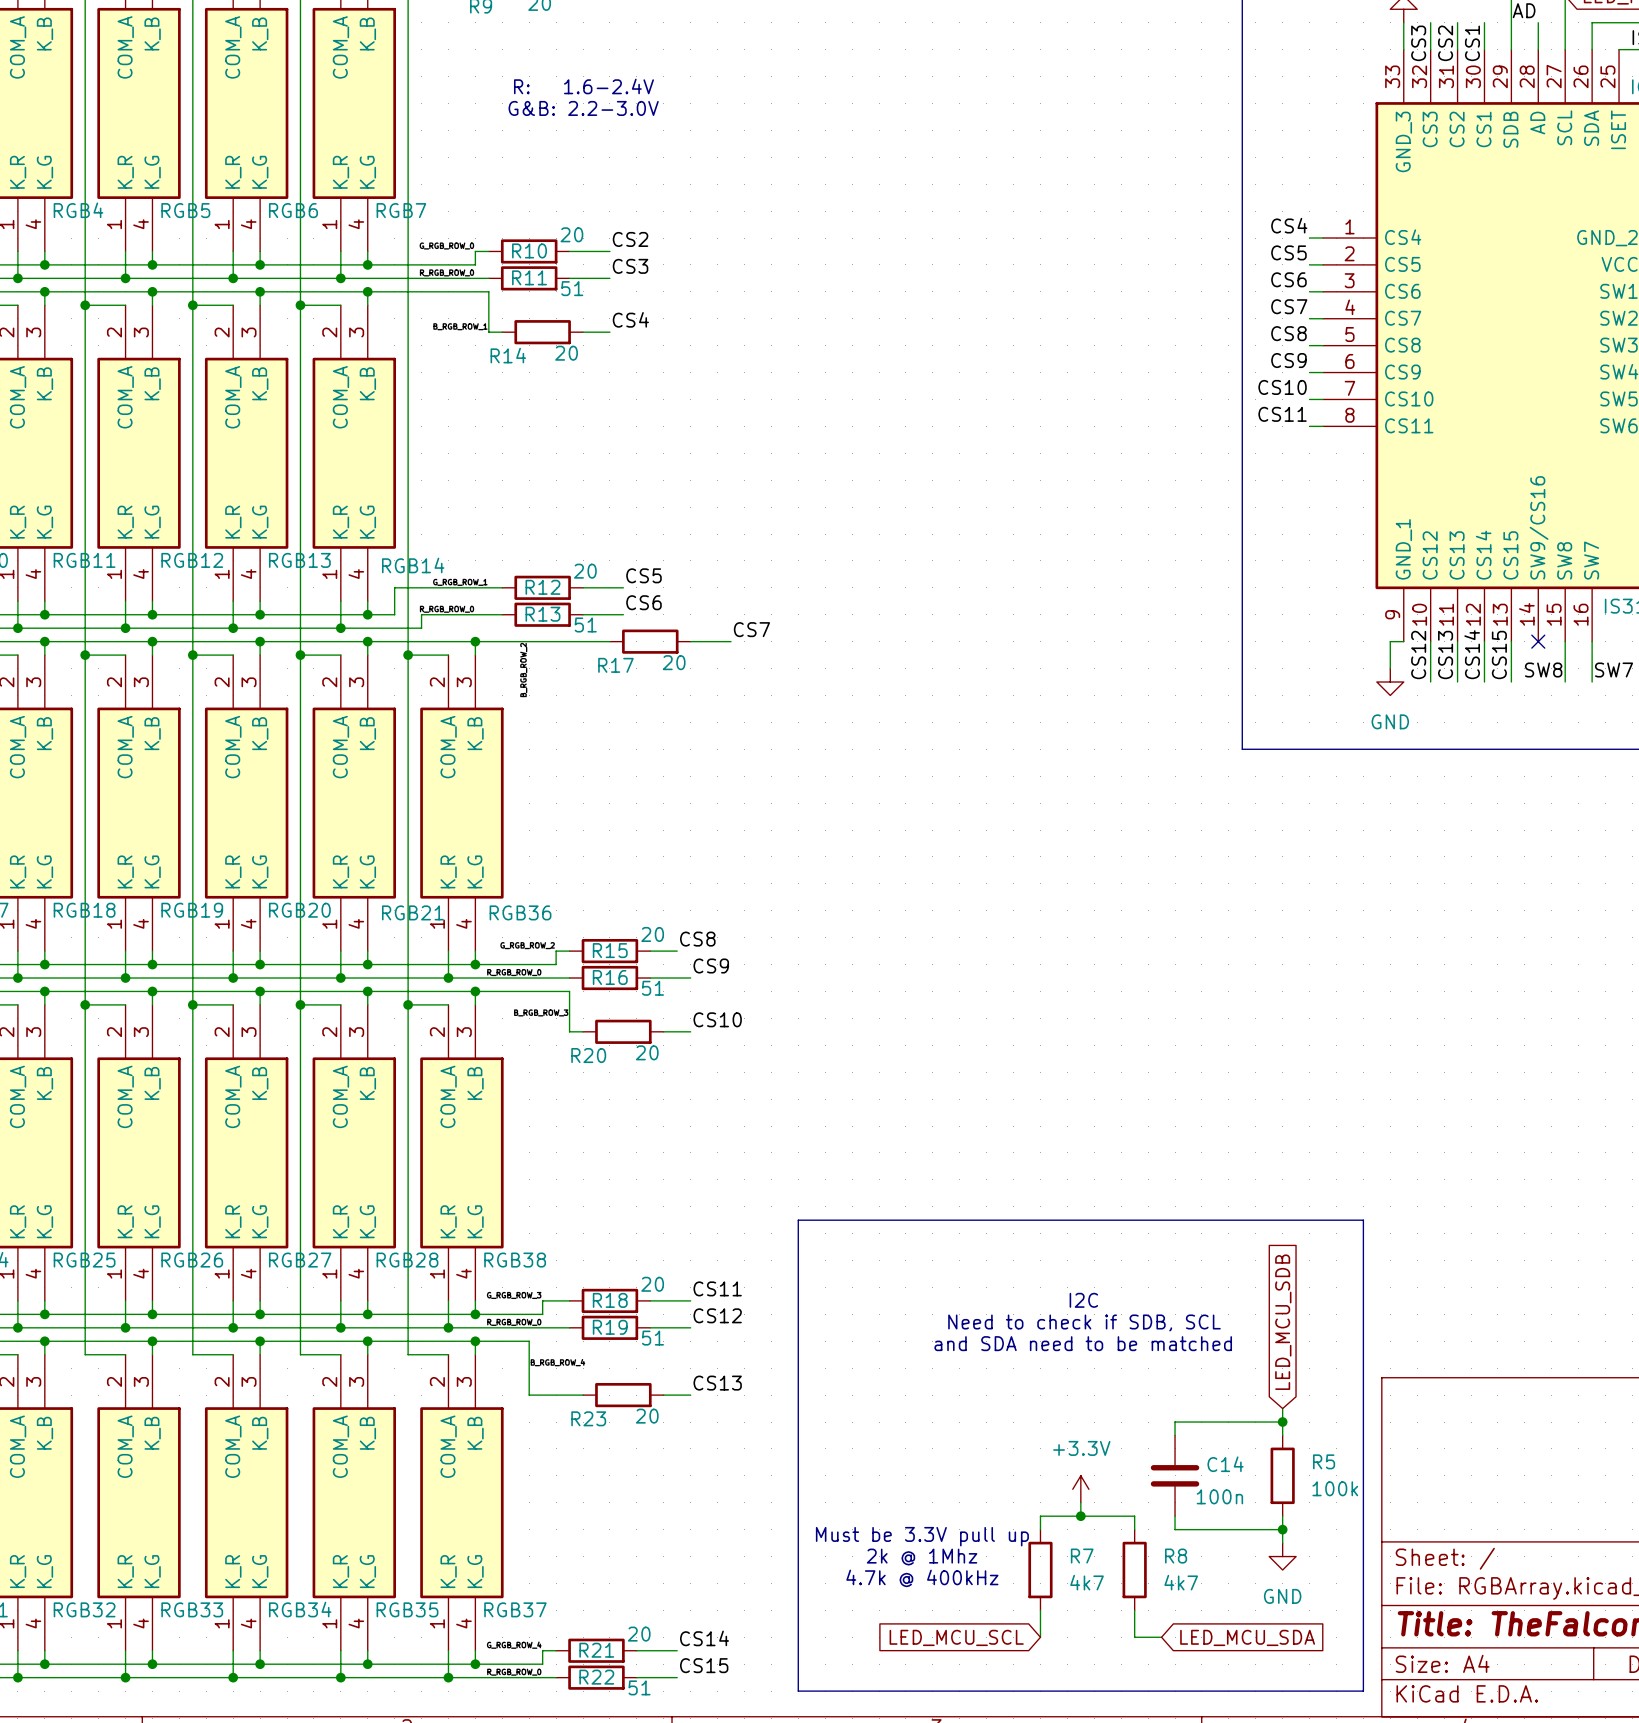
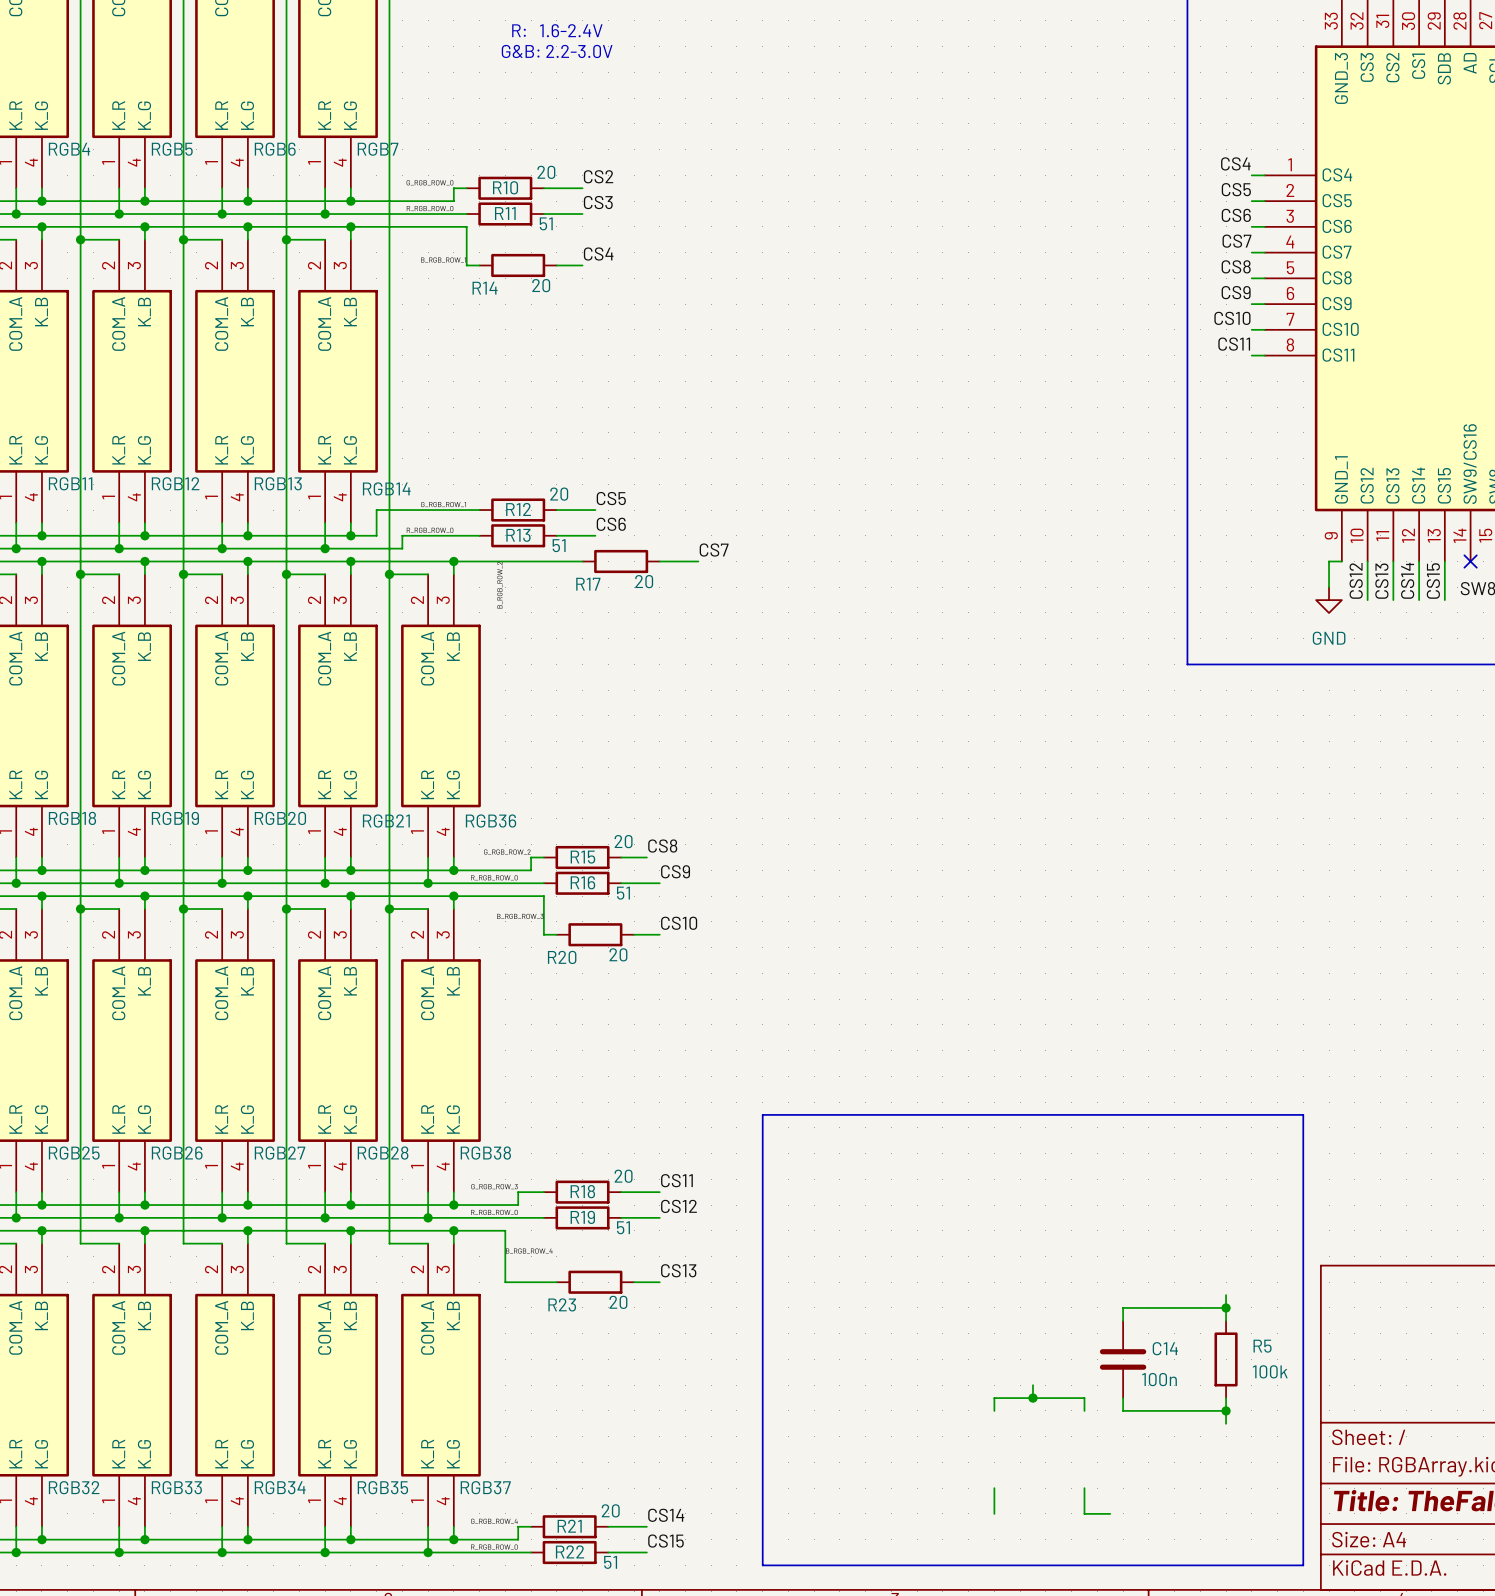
text: I2C (1083, 1300) -> none
text: Need to check if SDB, SCL (1084, 1322) -> none
global label: LED_MCU_SDB (1283, 1322) -> none
text: and SDA need to be matched (1083, 1343) -> none
power symbol: +3.3V (1080, 1489) -> none
text: Must be 3.3V pull up (922, 1536) -> none
power symbol: GND (1282, 1556) -> none
text: 2k @ 1Mhz (922, 1557) -> none
R7: 4k7 (1040, 1570) -> none
R8: 4k7 (1134, 1570) -> none
text: 4.7k @ 400kHz (922, 1578) -> none
global label: LED_MCU_SCL (956, 1637) -> none
global label: LED_MCU_SDA (1247, 1637) -> none

